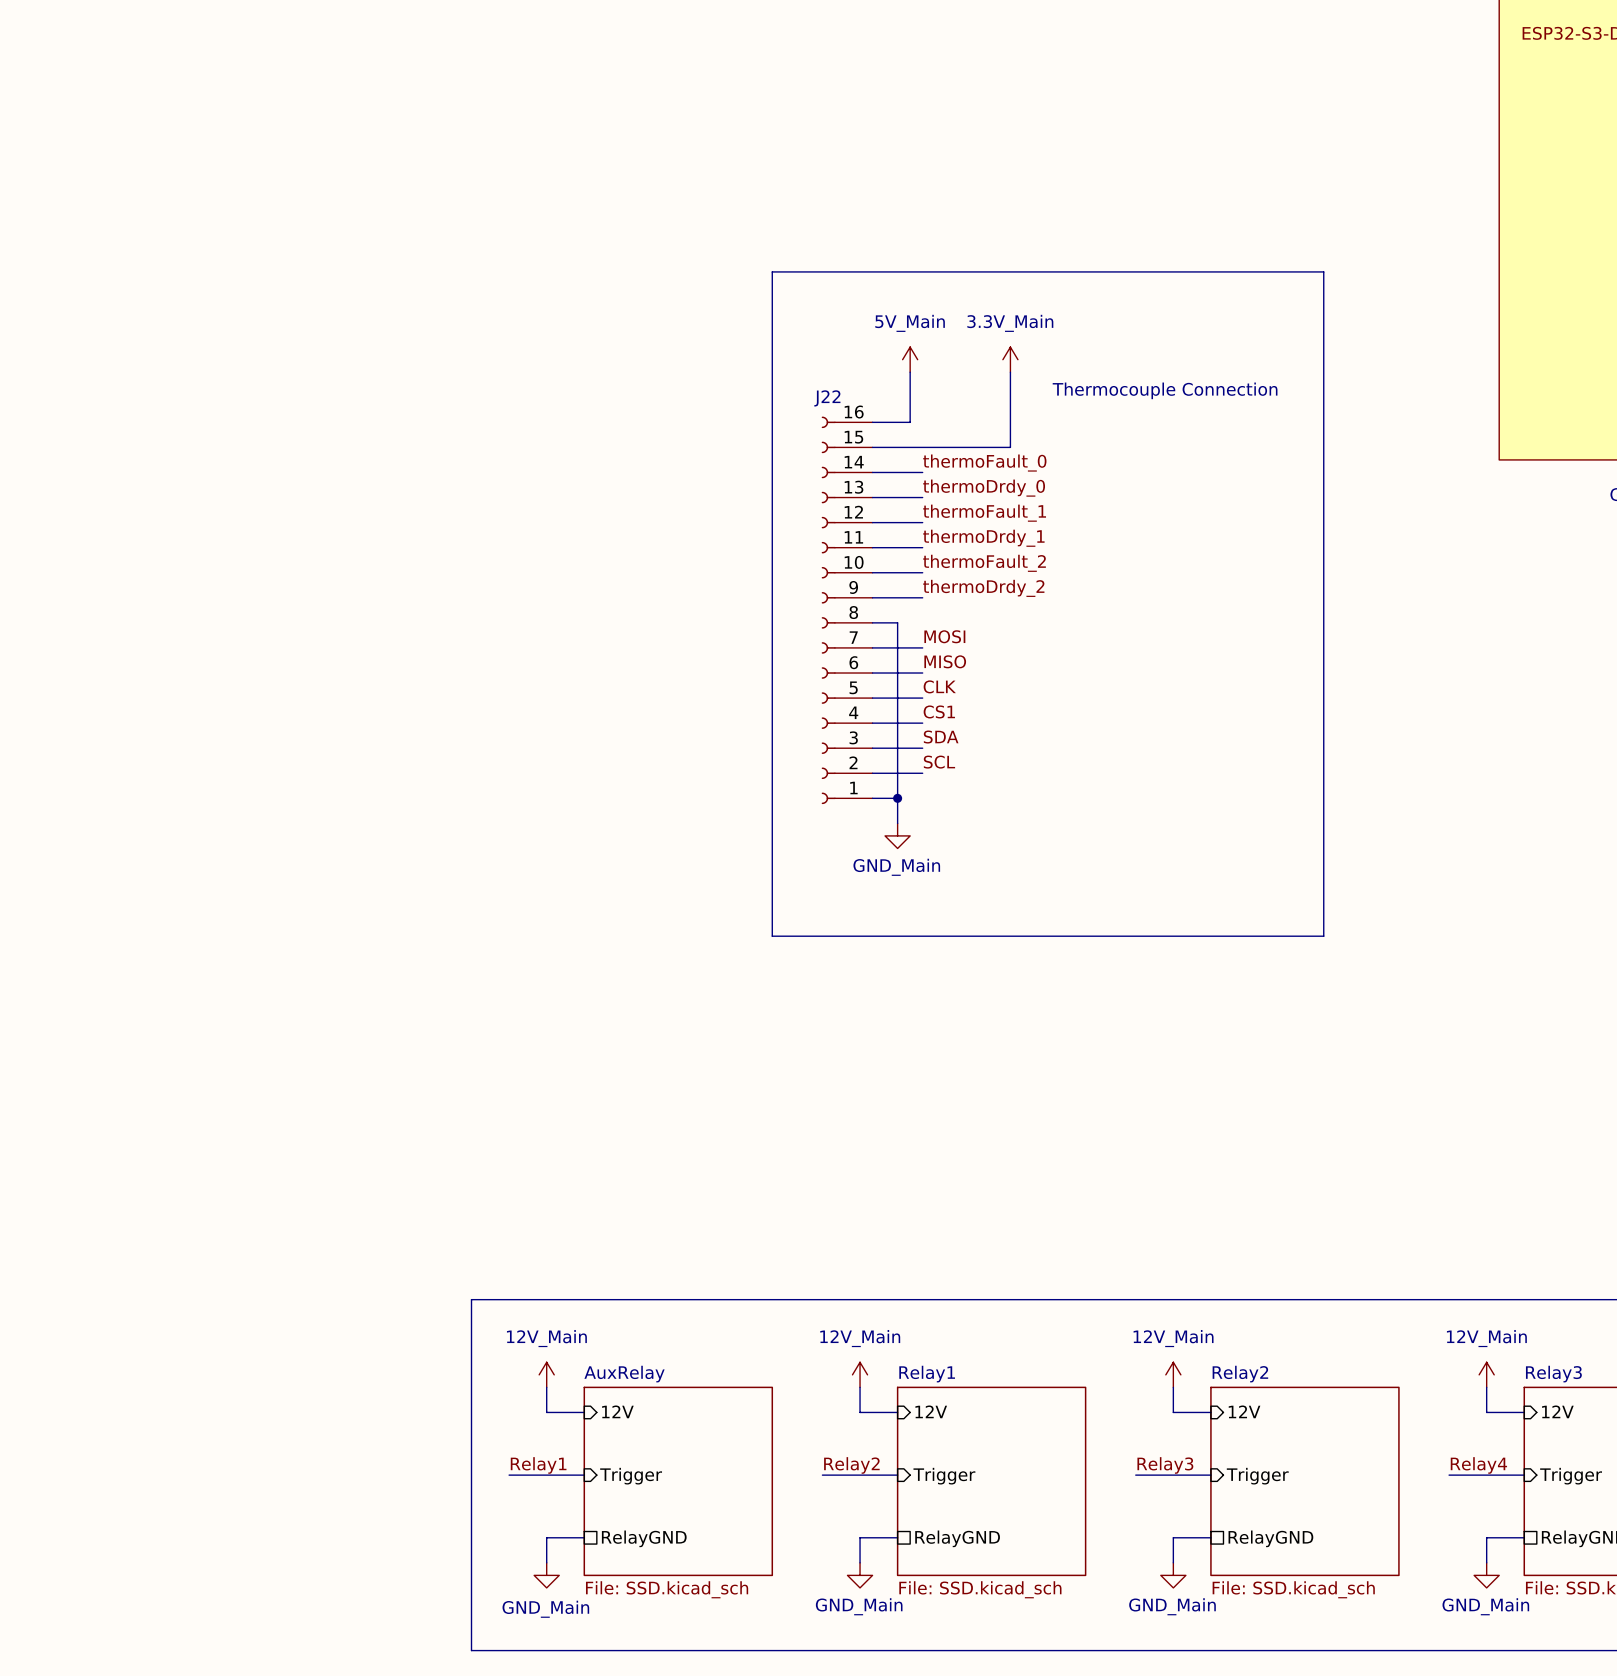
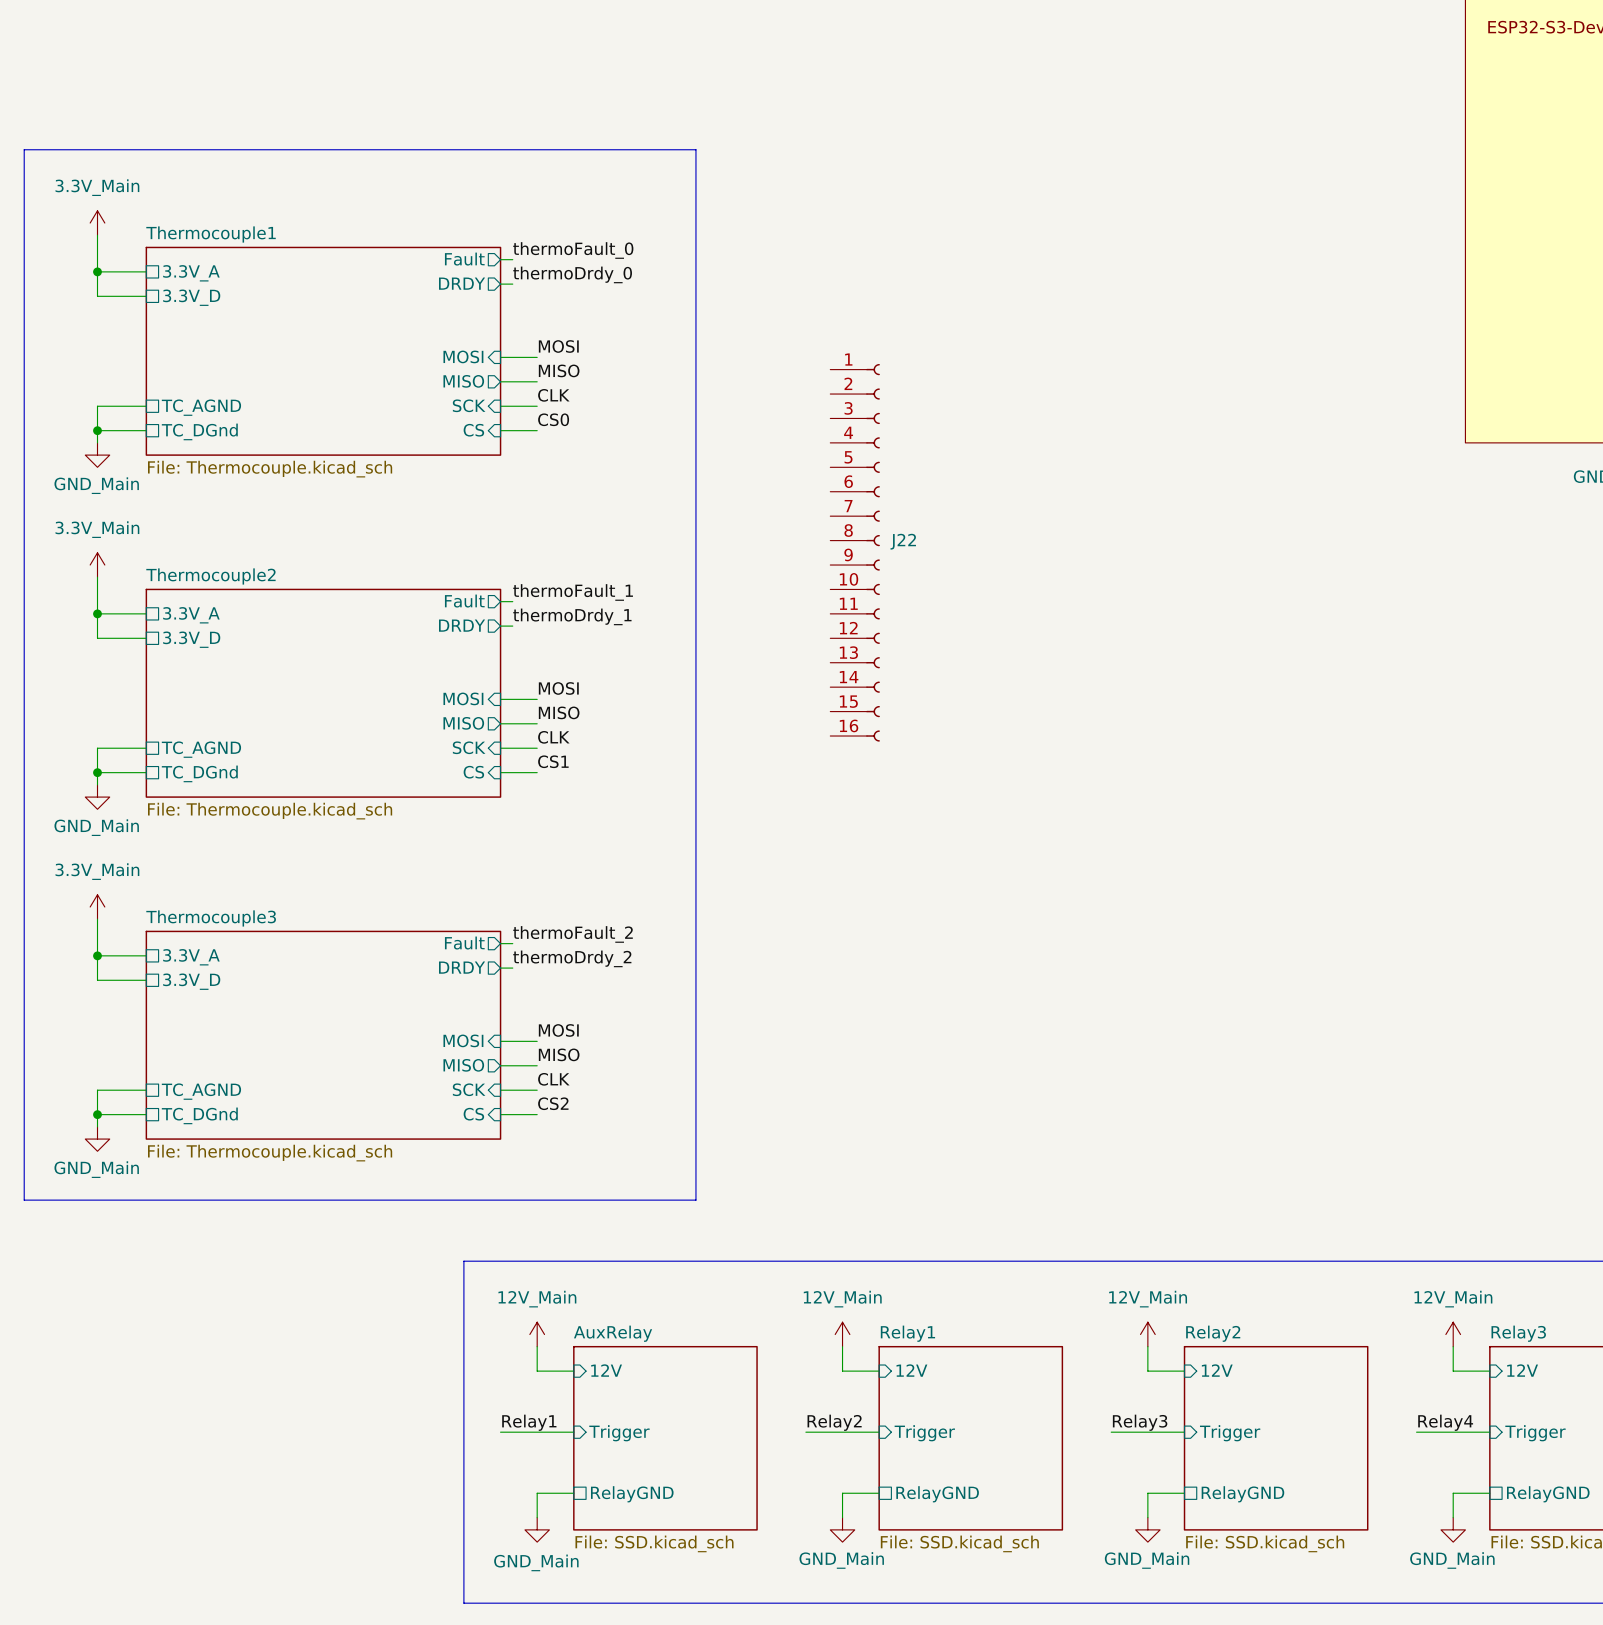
line: none -> (24, 149) (695, 149) (695, 1200) (24, 1200) (24, 149)
power symbol: none -> 3.3V_Main (97, 223)
wire: none -> (97, 235) (97, 296) (146, 296)
label: none -> thermoFault_0 (573, 250)
sheet pin: none -> Fault (464, 259)
wire: none -> (500, 259) (512, 259)
line: (772, 271) (1323, 271) (1323, 936) (772, 936) (772, 271) -> none
wire: none -> (97, 271) (146, 271)
junction: none -> (97, 271)
sheet pin: none -> 3.3V_A (191, 273)
label: none -> thermoDrdy_0 (572, 274)
sheet pin: none -> DRDY (462, 283)
wire: none -> (500, 284) (512, 284)
sheet pin: none -> 3.3V_D (191, 297)
power symbol: 5V_Main (910, 359) -> none
power symbol: 3.3V_Main (1010, 359) -> none
label: none -> MOSI (558, 346)
sheet Thermocouple1: none -> File: Thermocouple.kicad_sch (323, 351)
sheet pin: none -> MOSI (463, 356)
wire: none -> (500, 357) (537, 357)
wire: (910, 372) (910, 422) (872, 422) -> none
wire: (1010, 372) (1010, 447) (872, 447) -> none
label: none -> MISO (559, 370)
text: Thermocouple Connection (1165, 390) -> none
sheet pin: none -> MISO (463, 381)
wire: none -> (500, 381) (537, 381)
J22 name position: J22 (827, 398) -> J22 (903, 541)
label: none -> CLK (553, 395)
sheet pin: none -> SCK (469, 405)
wire: none -> (146, 406) (97, 406) (97, 442)
wire: none -> (500, 406) (537, 406)
sheet pin: none -> TC_AGND (201, 407)
label: none -> CS0 (553, 419)
sheet pin: none -> CS (473, 430)
wire: none -> (97, 430) (146, 430)
junction: none -> (97, 430)
wire: none -> (500, 430) (537, 430)
sheet pin: none -> TC_DGnd (199, 431)
label: thermoFault_0 (984, 463) -> none
power symbol: none -> GND_Main (97, 455)
wire: (872, 472) (922, 472) -> none
label: thermoDrdy_0 (984, 488) -> none
wire: (872, 497) (922, 497) -> none
label: thermoFault_1 (984, 513) -> none
wire: (872, 522) (922, 522) -> none
label: thermoDrdy_1 (983, 538) -> none
wire: (872, 547) (922, 547) -> none
label: thermoFault_2 (984, 563) -> none
wire: (872, 572) (922, 572) -> none
power symbol: none -> 3.3V_Main (97, 565)
label: thermoDrdy_2 (983, 588) -> none
wire: none -> (97, 577) (97, 638) (146, 638)
wire: (872, 597) (922, 597) -> none
J22 rotation: 0° (828, 610) -> 180° (873, 552)
label: none -> thermoFault_1 (573, 592)
sheet pin: none -> Fault (464, 601)
wire: none -> (500, 601) (512, 601)
wire: (872, 622) (897, 622) (897, 823) -> none
wire: none -> (97, 613) (146, 613)
junction: none -> (97, 613)
sheet pin: none -> 3.3V_A (191, 615)
label: MOSI (944, 636) -> none
label: none -> thermoDrdy_1 (572, 616)
sheet pin: none -> DRDY (462, 625)
wire: none -> (500, 626) (512, 626)
wire: (872, 647) (922, 647) -> none
sheet pin: none -> 3.3V_D (191, 639)
label: MISO (945, 661) -> none
wire: (872, 673) (922, 673) -> none
label: CLK (939, 686) -> none
wire: (872, 698) (922, 698) -> none
label: none -> MOSI (558, 688)
label: CS1 (939, 711) -> none
sheet Thermocouple2: none -> File: Thermocouple.kicad_sch (323, 693)
sheet pin: none -> MOSI (463, 698)
wire: none -> (500, 699) (537, 699)
wire: (872, 723) (922, 723) -> none
label: none -> MISO (559, 712)
label: SDA (941, 737) -> none
sheet pin: none -> MISO (463, 723)
wire: none -> (500, 723) (537, 723)
wire: (872, 748) (922, 748) -> none
label: none -> CLK (553, 737)
label: SCL (939, 762) -> none
sheet pin: none -> SCK (469, 747)
wire: none -> (146, 748) (97, 748) (97, 784)
wire: none -> (500, 748) (537, 748)
wire: (872, 773) (922, 773) -> none
sheet pin: none -> TC_AGND (201, 749)
label: none -> CS1 (553, 761)
sheet pin: none -> CS (473, 772)
wire: none -> (97, 772) (146, 772)
junction: none -> (97, 772)
wire: none -> (500, 772) (537, 772)
wire: (872, 798) (897, 798) -> none
junction: (897, 798) -> none
sheet pin: none -> TC_DGnd (199, 773)
power symbol: none -> GND_Main (97, 797)
power symbol: GND_Main (897, 835) -> none
power symbol: none -> 3.3V_Main (97, 907)
wire: none -> (97, 919) (97, 980) (146, 980)
label: none -> thermoFault_2 (573, 934)
sheet pin: none -> Fault (464, 943)
wire: none -> (500, 943) (512, 943)
wire: none -> (97, 955) (146, 955)
junction: none -> (97, 955)
sheet pin: none -> 3.3V_A (191, 957)
label: none -> thermoDrdy_2 (572, 958)
sheet pin: none -> DRDY (462, 967)
wire: none -> (500, 968) (512, 968)
sheet pin: none -> 3.3V_D (191, 981)
label: none -> MOSI (558, 1030)
sheet Thermocouple3: none -> File: Thermocouple.kicad_sch (323, 1035)
sheet pin: none -> MOSI (463, 1040)
wire: none -> (500, 1041) (537, 1041)
label: none -> MISO (559, 1054)
sheet pin: none -> MISO (463, 1065)
wire: none -> (500, 1065) (537, 1065)
label: none -> CLK (553, 1079)
sheet pin: none -> SCK (469, 1089)
wire: none -> (146, 1090) (97, 1090) (97, 1126)
wire: none -> (500, 1090) (537, 1090)
sheet pin: none -> TC_AGND (201, 1091)
label: none -> CS2 (553, 1103)
sheet pin: none -> CS (473, 1114)
wire: none -> (97, 1114) (146, 1114)
junction: none -> (97, 1114)
wire: none -> (500, 1114) (537, 1114)
sheet pin: none -> TC_DGnd (199, 1115)
power symbol: none -> GND_Main (97, 1139)

